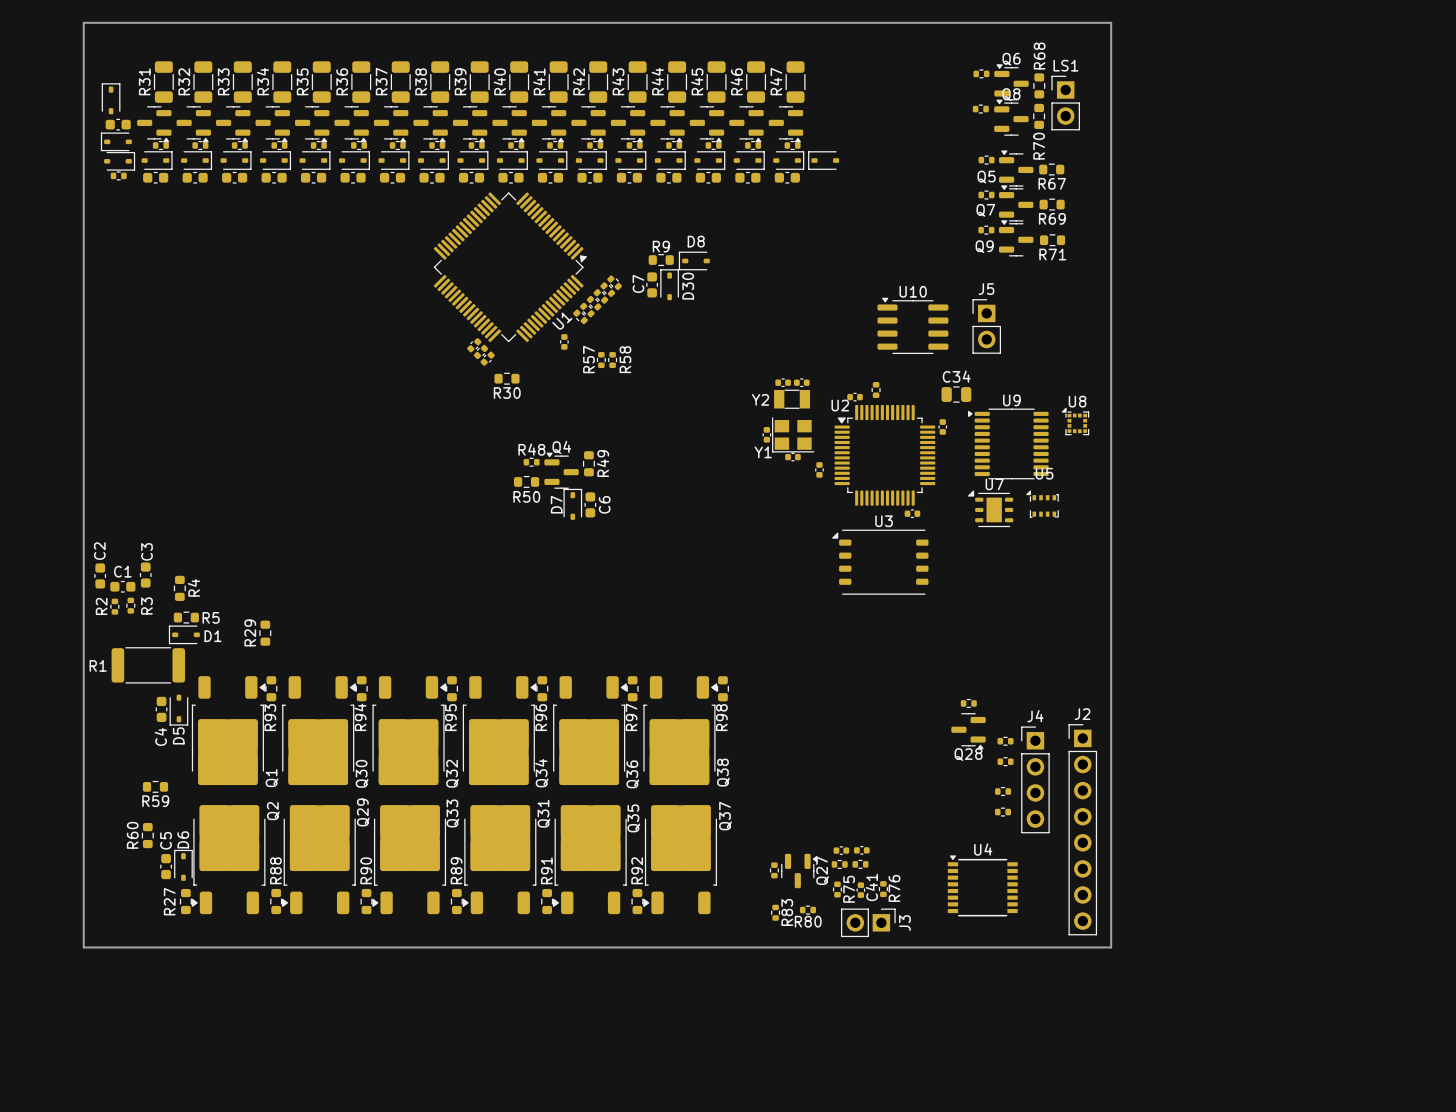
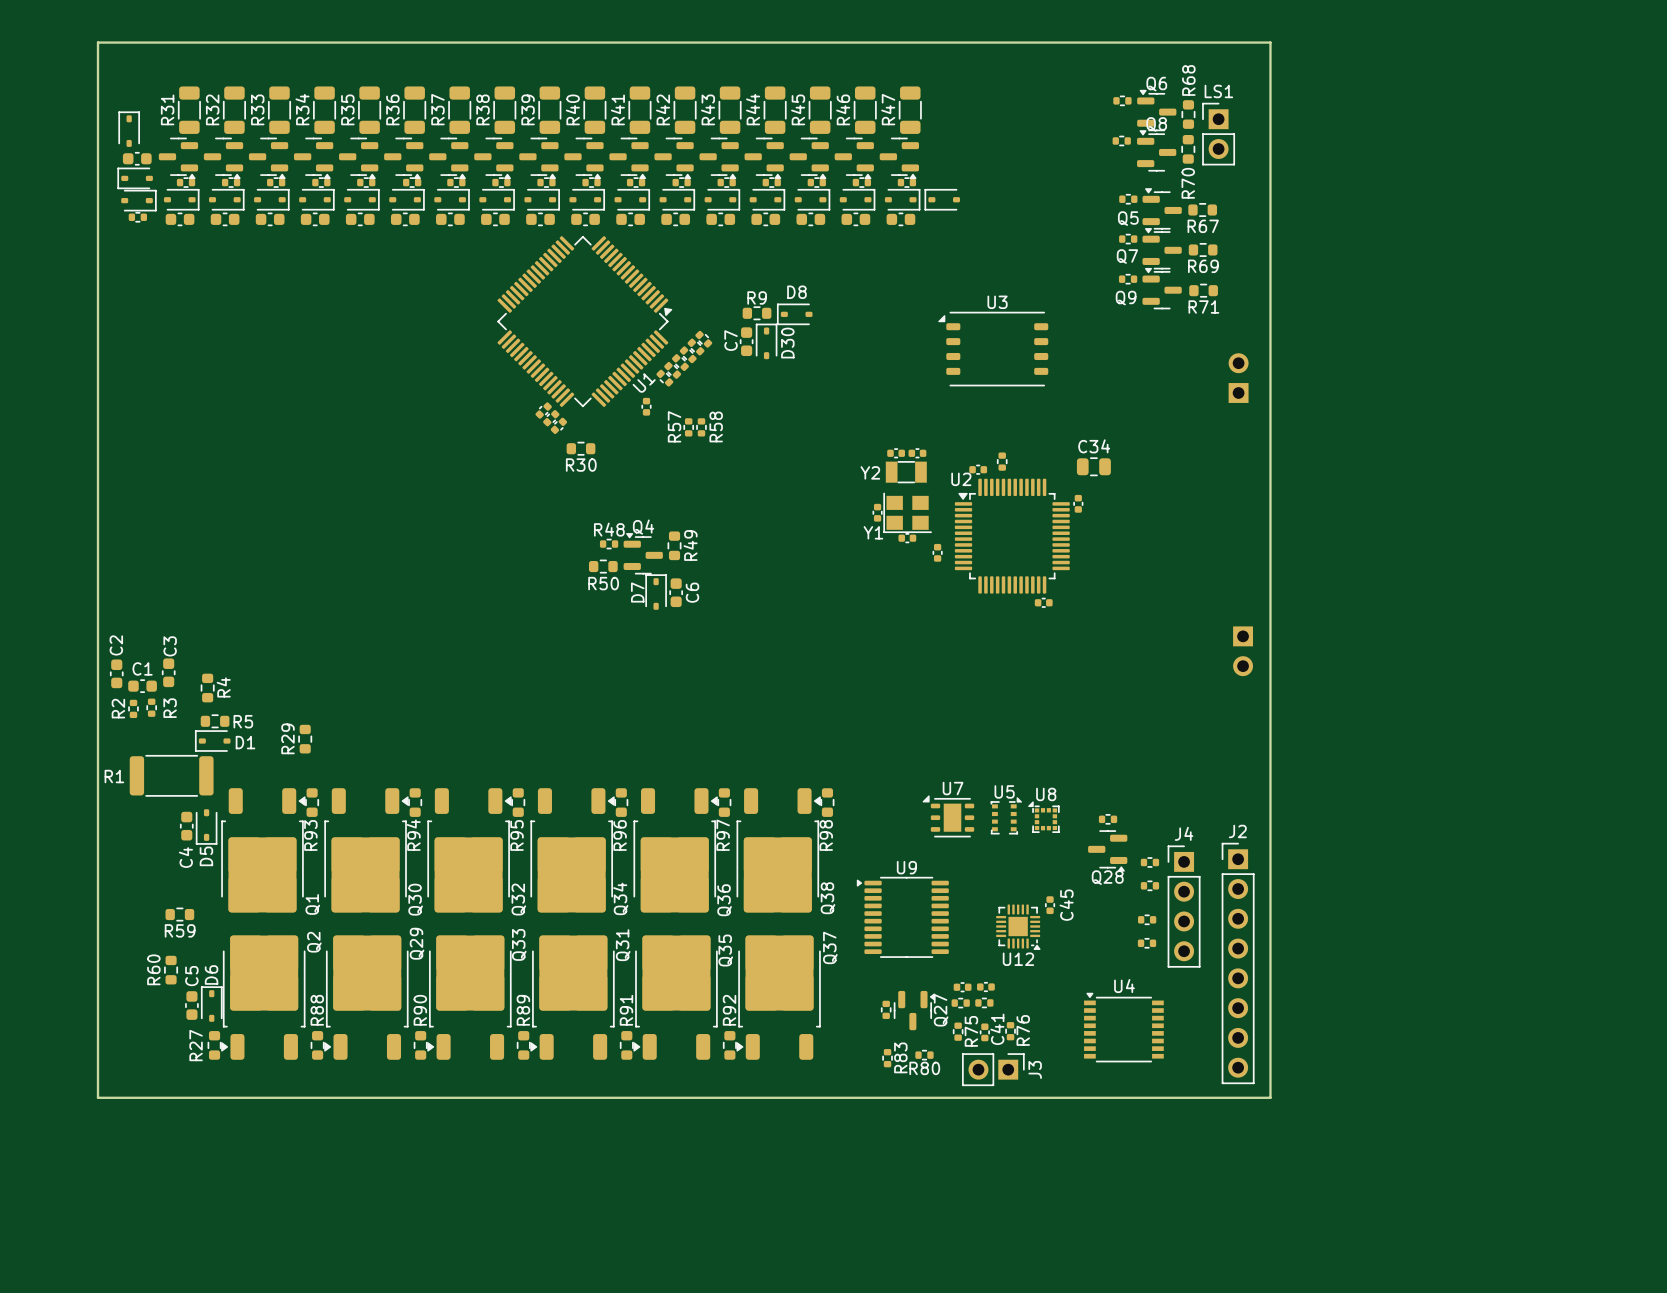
U10: (912, 325) -> none
J5 side: top (986, 326) -> bottom (1238, 378)
U8 position: (1075, 421) -> (1043, 817)
U9 position: (1008, 443) -> (902, 917)
U5 rotation: 0° (1042, 504) -> 90° clockwise (1006, 815)
U5 position: (1042, 504) -> (1006, 815)
U7 position: (990, 508) -> (948, 816)
part: none -> (1243, 651)
U3 position: (880, 562) -> (993, 349)
C45: none -> (1050, 905)
U12: none -> (1018, 927)

